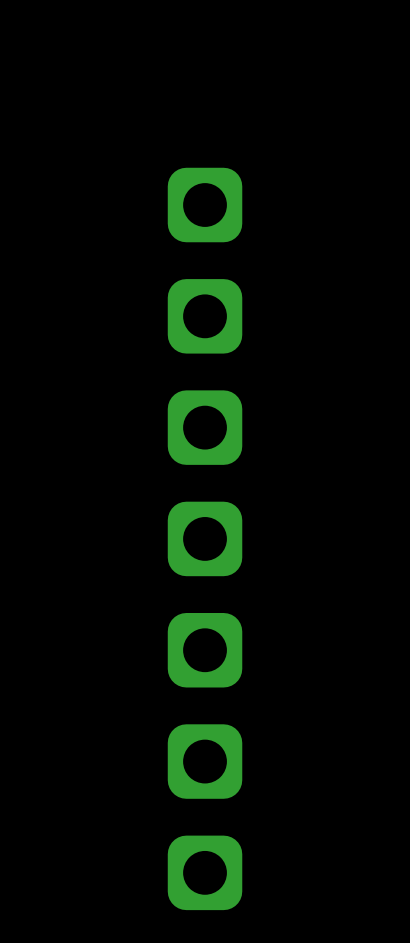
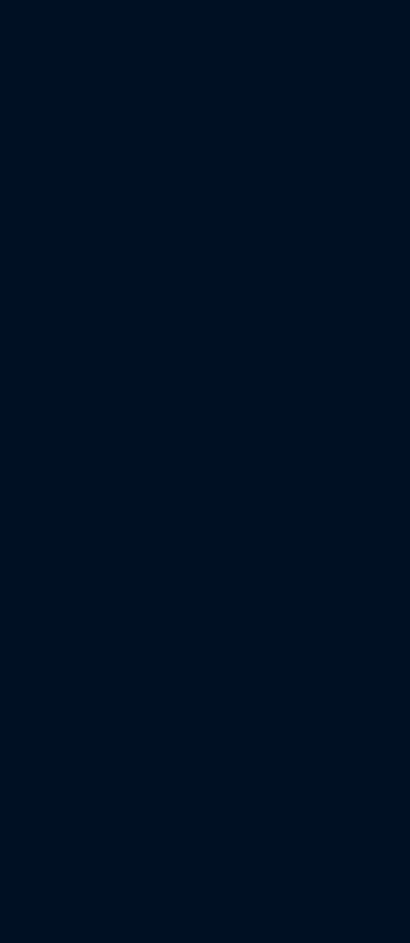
part: (205, 538) -> none

